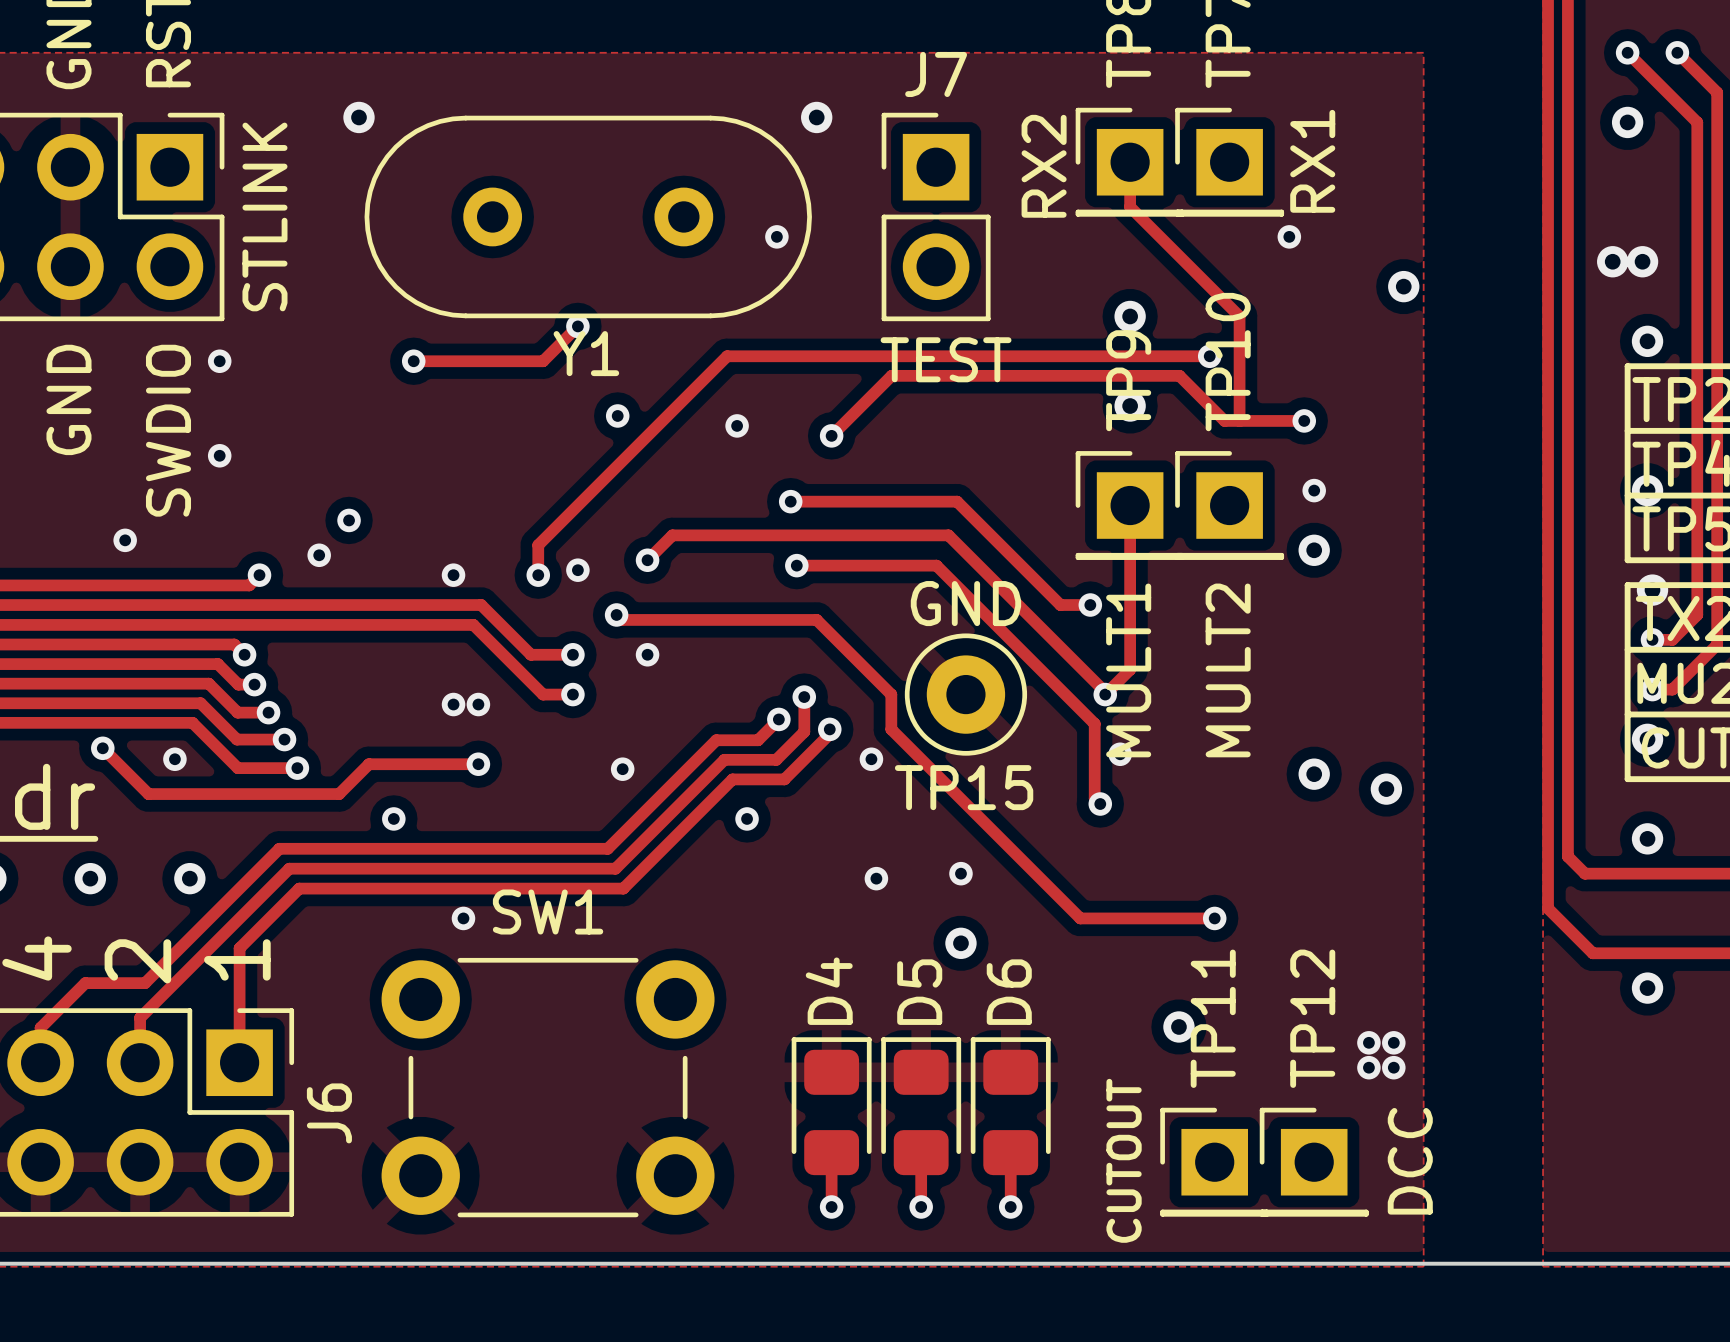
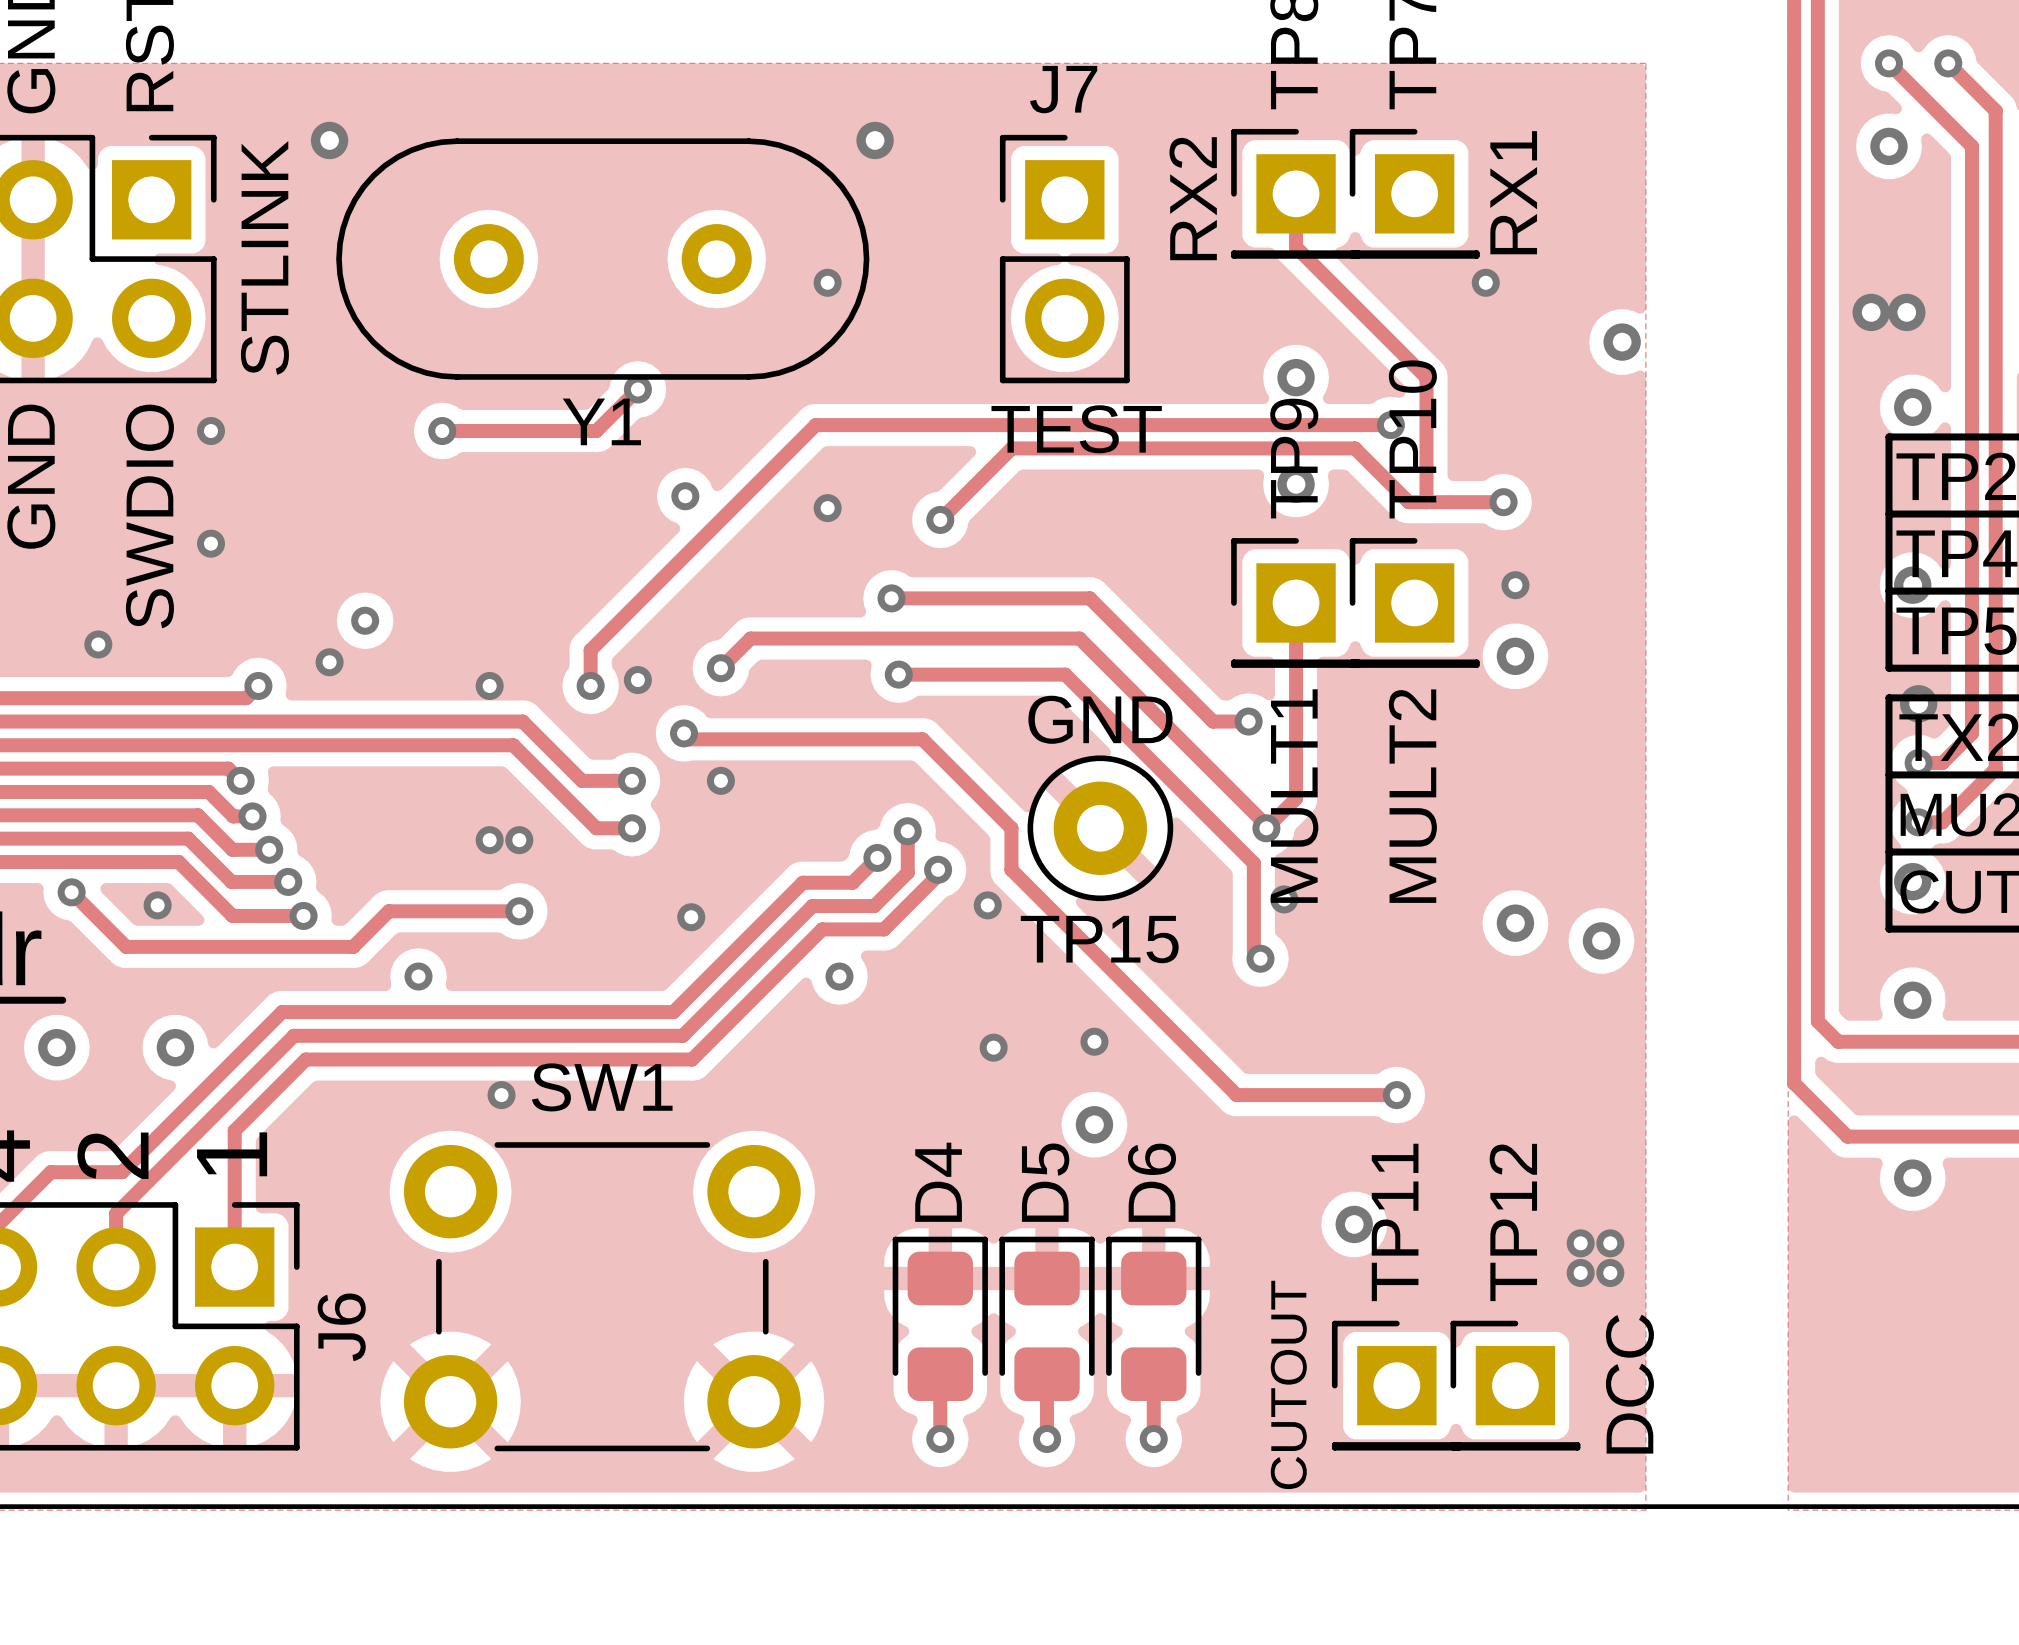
via position: (359, 117) -> (329, 140)
via position: (816, 117) -> (875, 140)
Y1 position: (588, 216) -> (602, 259)
via position: (776, 236) -> (827, 282)

